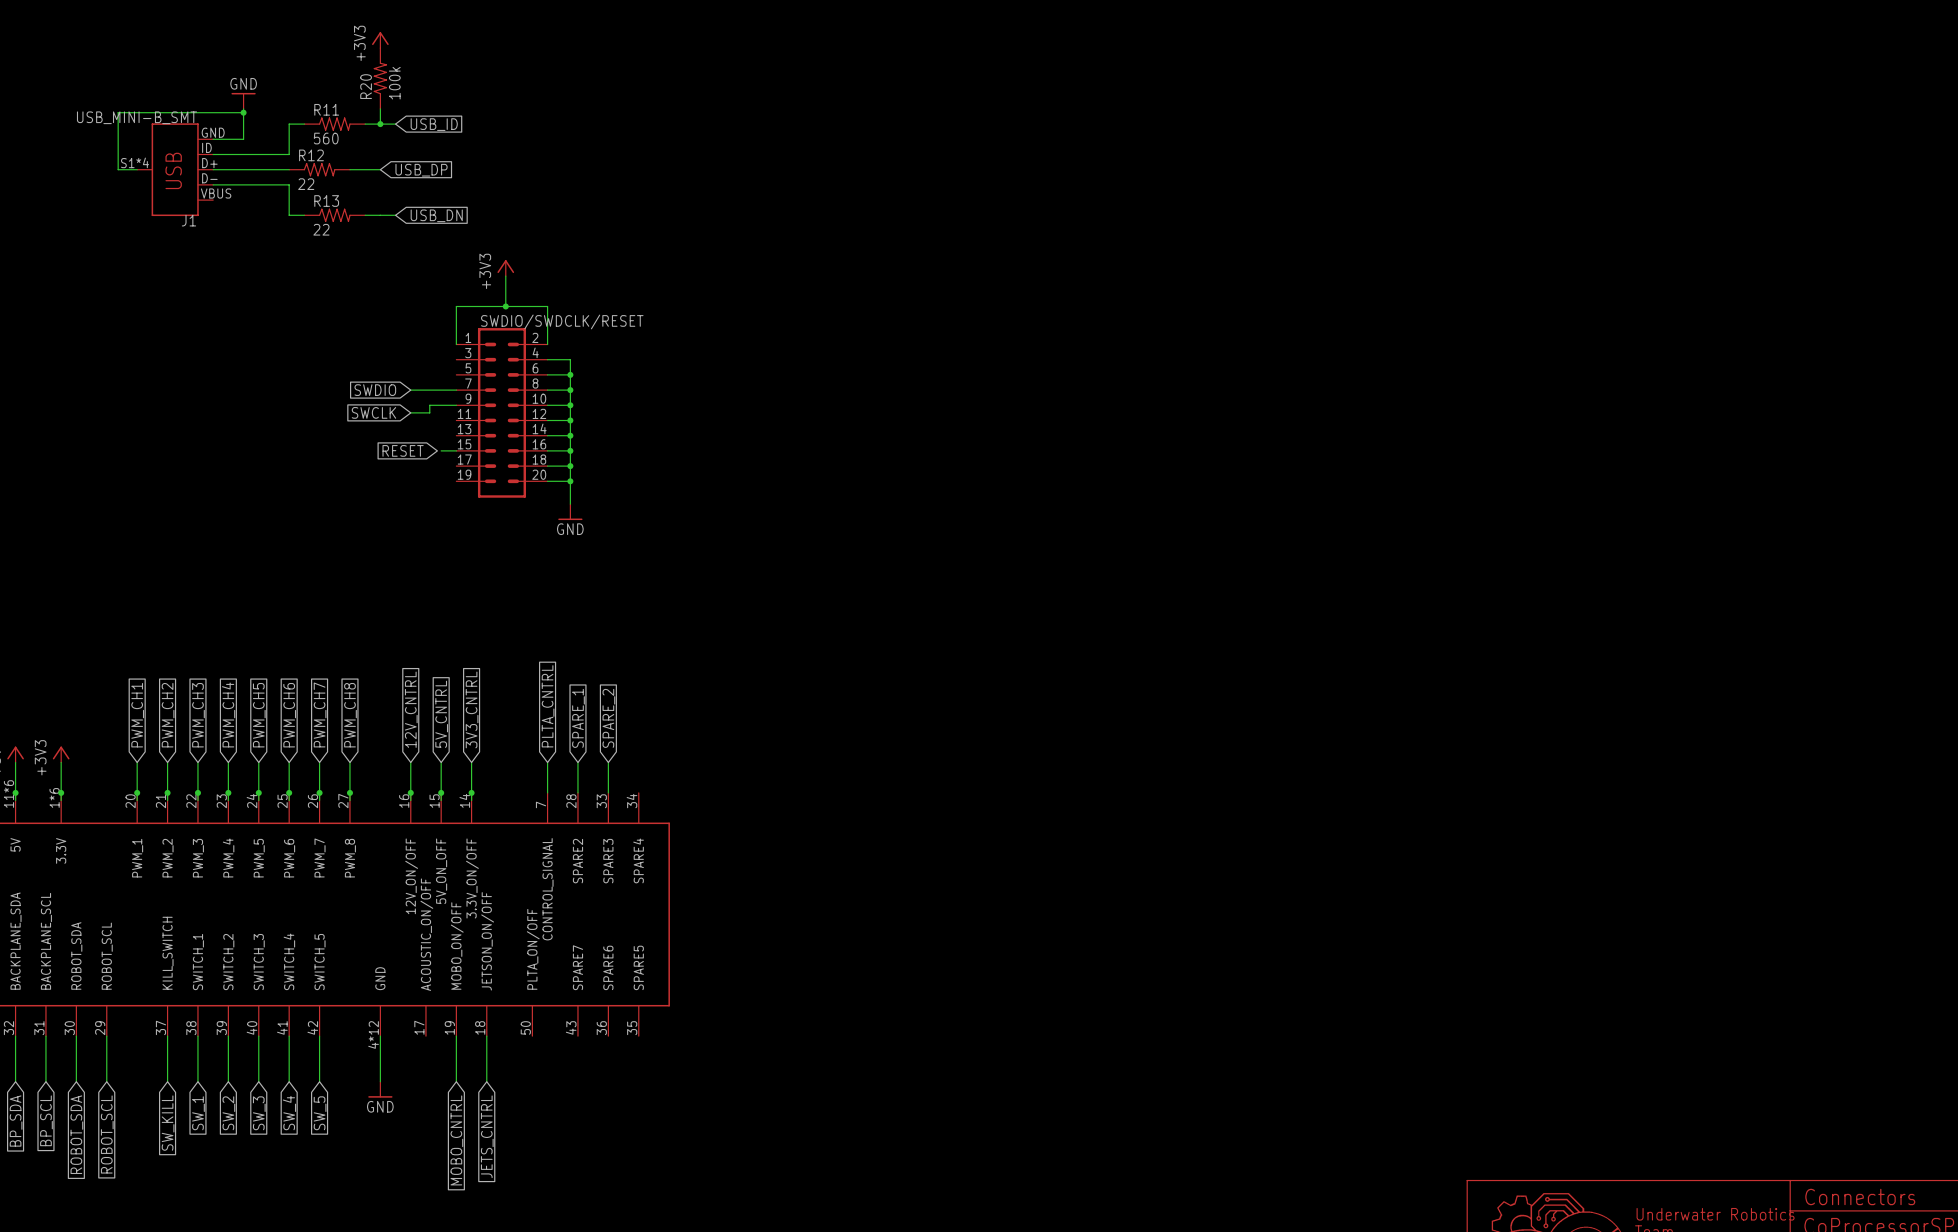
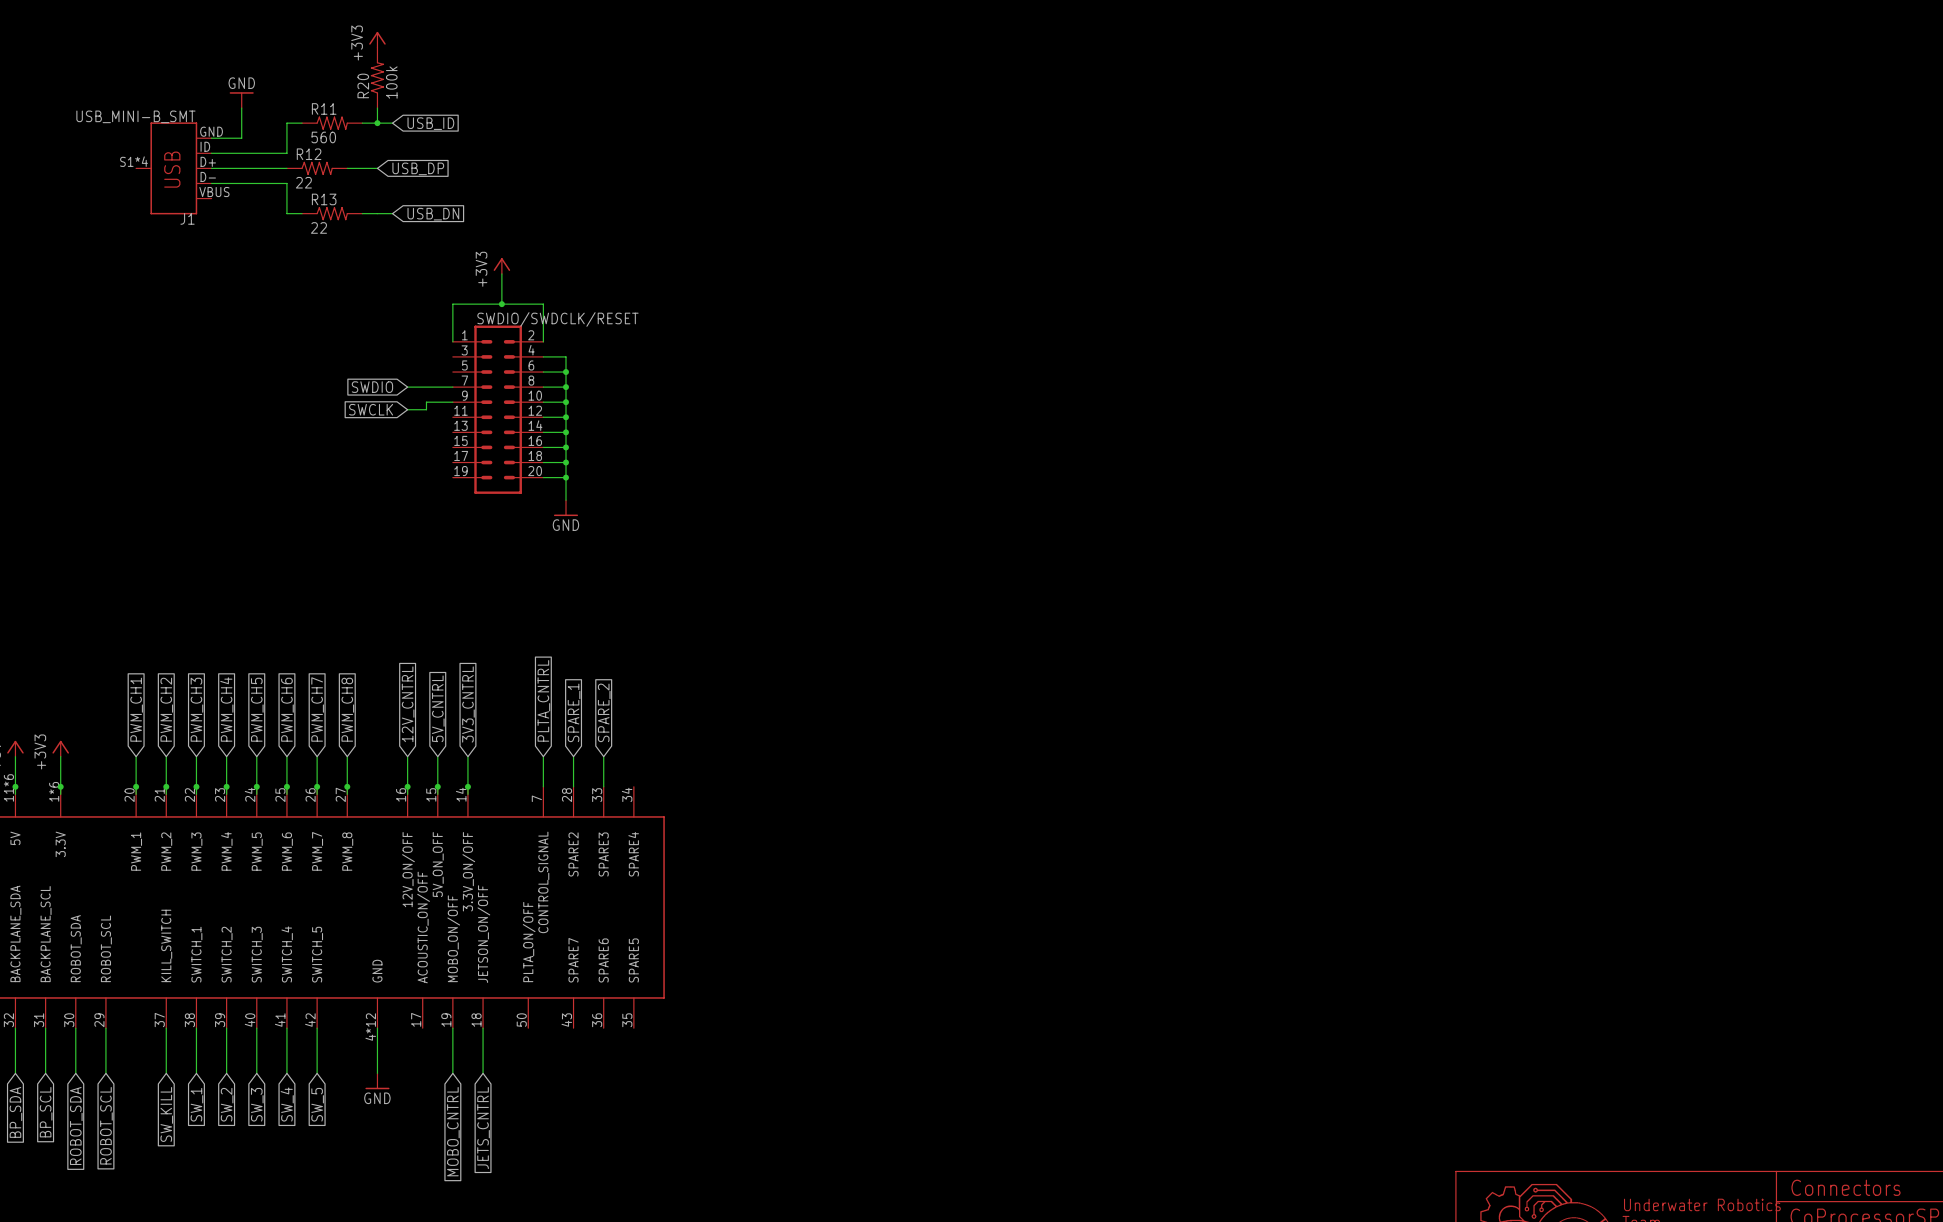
wire: (243, 112) (118, 112) (118, 169) (137, 169) -> none
junction: (243, 112) -> none
global label: RESET (403, 450) -> none
wire: (441, 450) (456, 450) -> none

